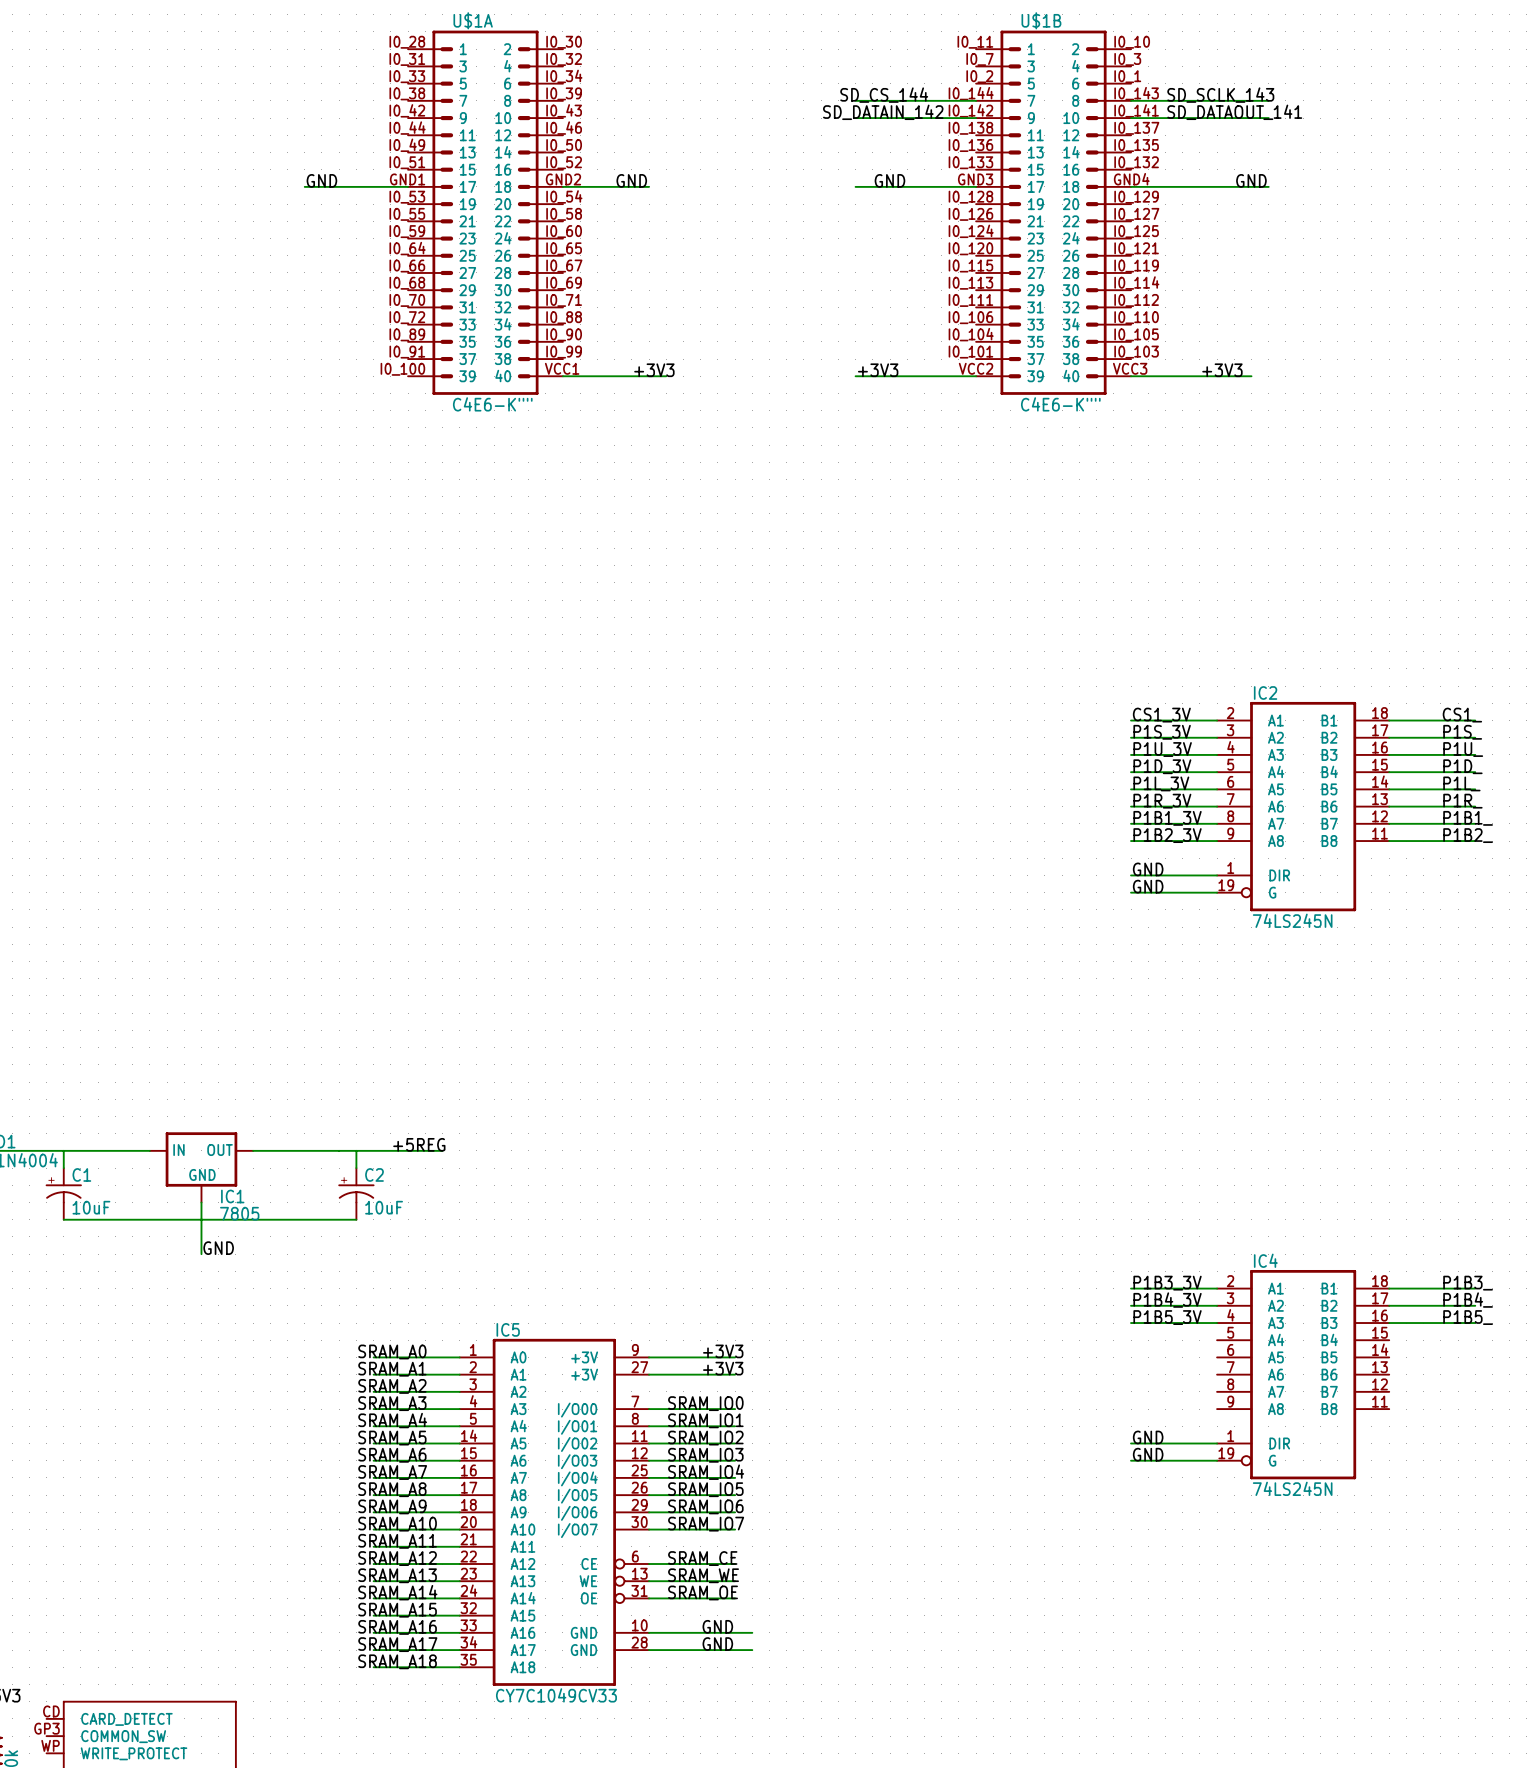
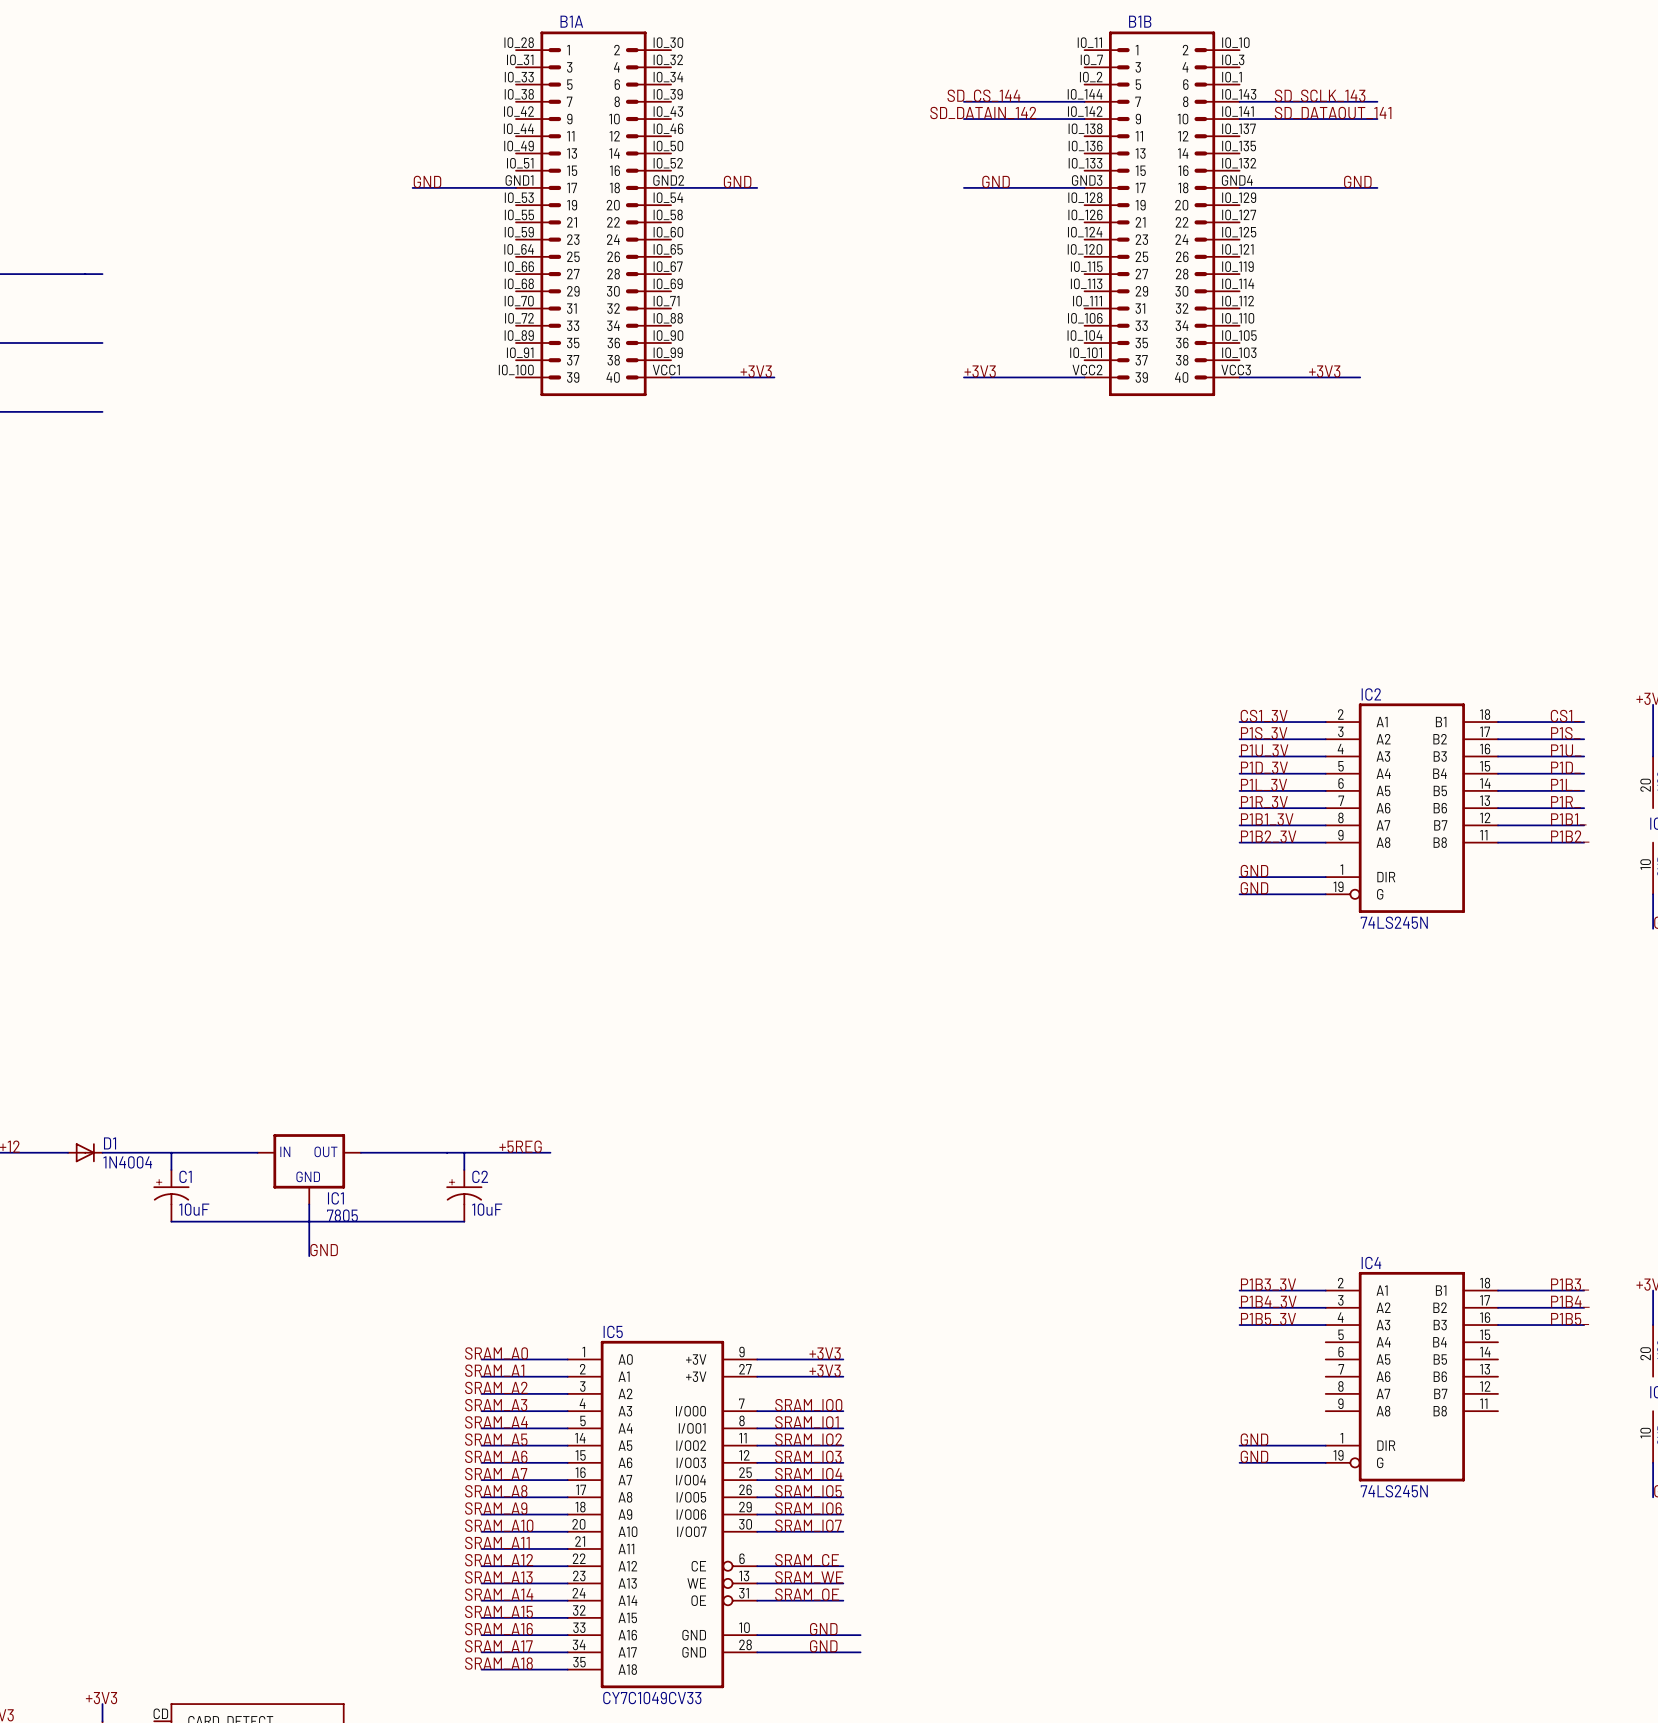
U$1A name: U$1A (473, 20) -> B1A (571, 21)
U$1B name: U$1B (1041, 20) -> B1B (1140, 21)
U$1A value: C4E6-K"" (492, 404) -> none
U$1B value: C4E6-K"" (1060, 404) -> none

